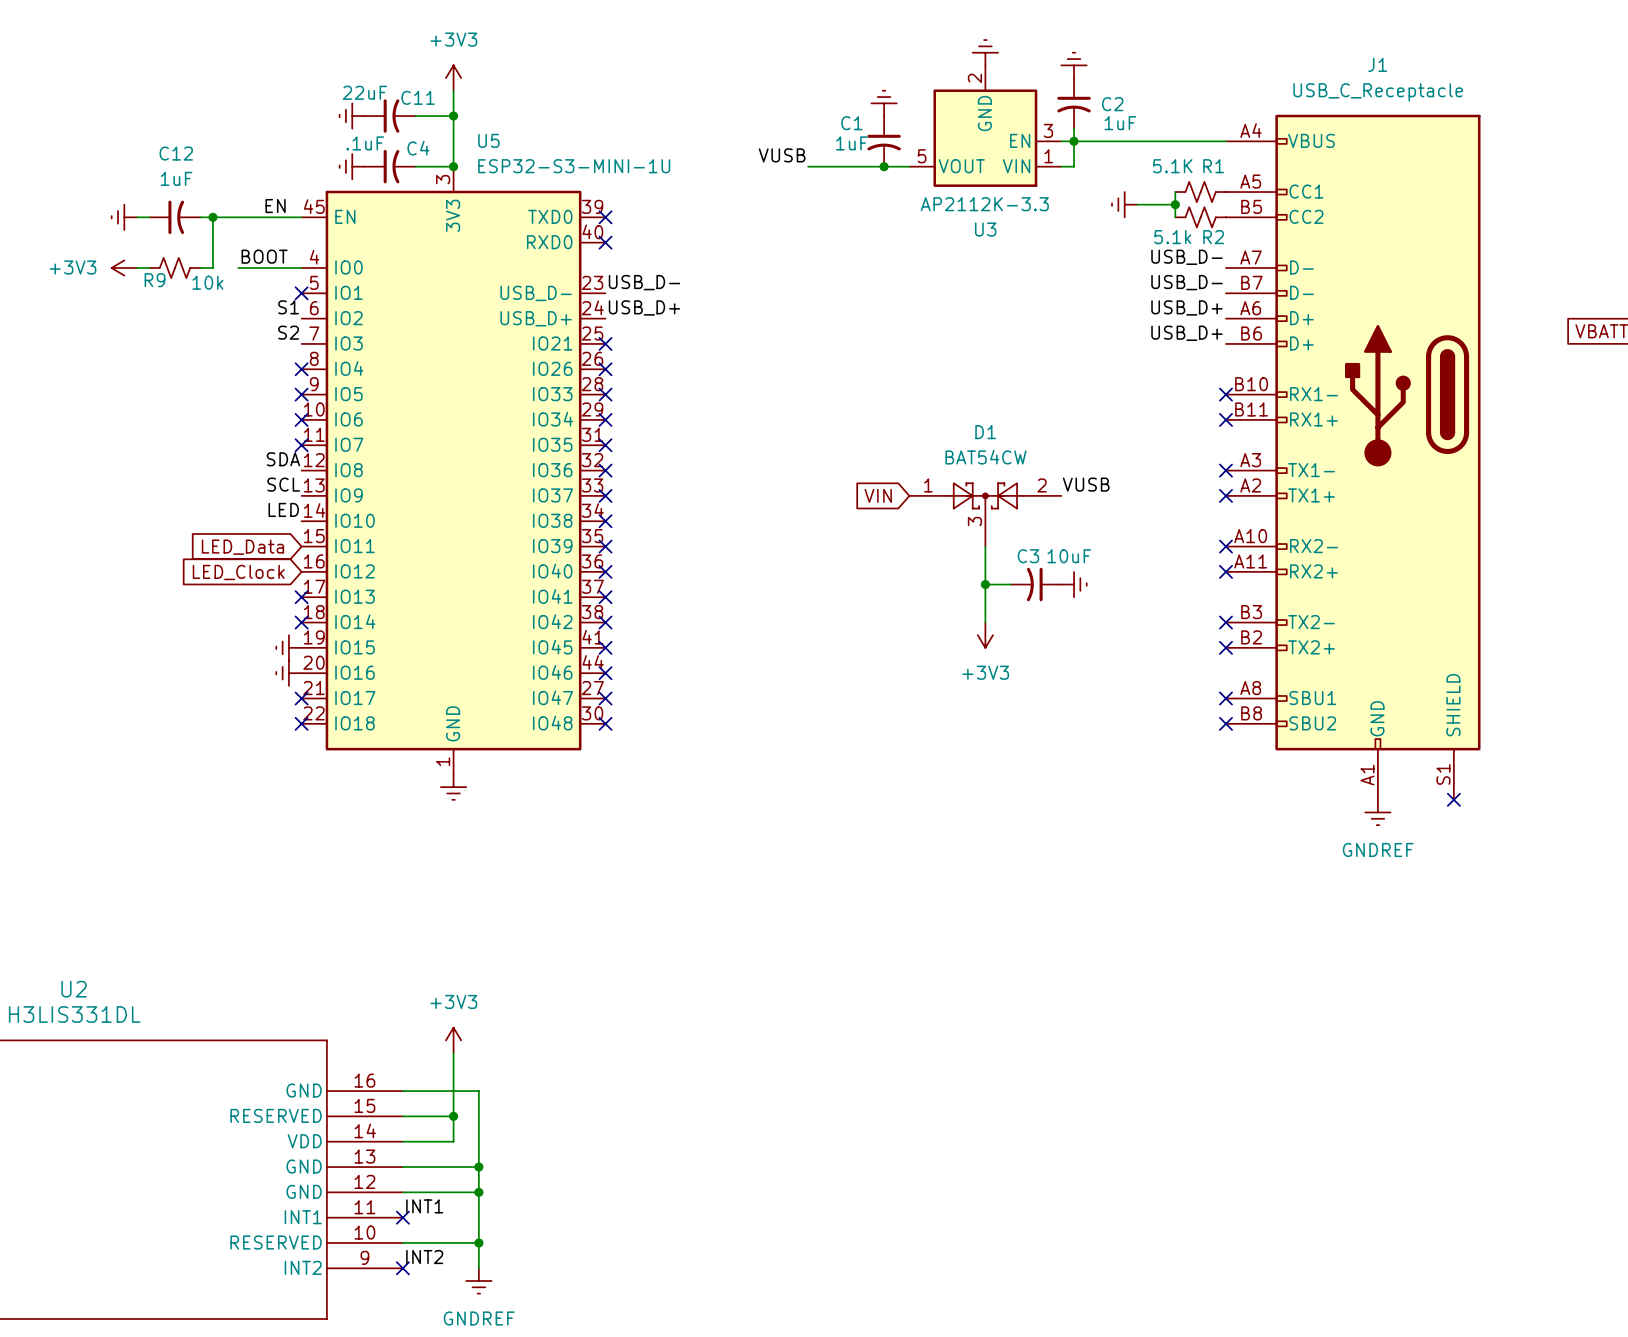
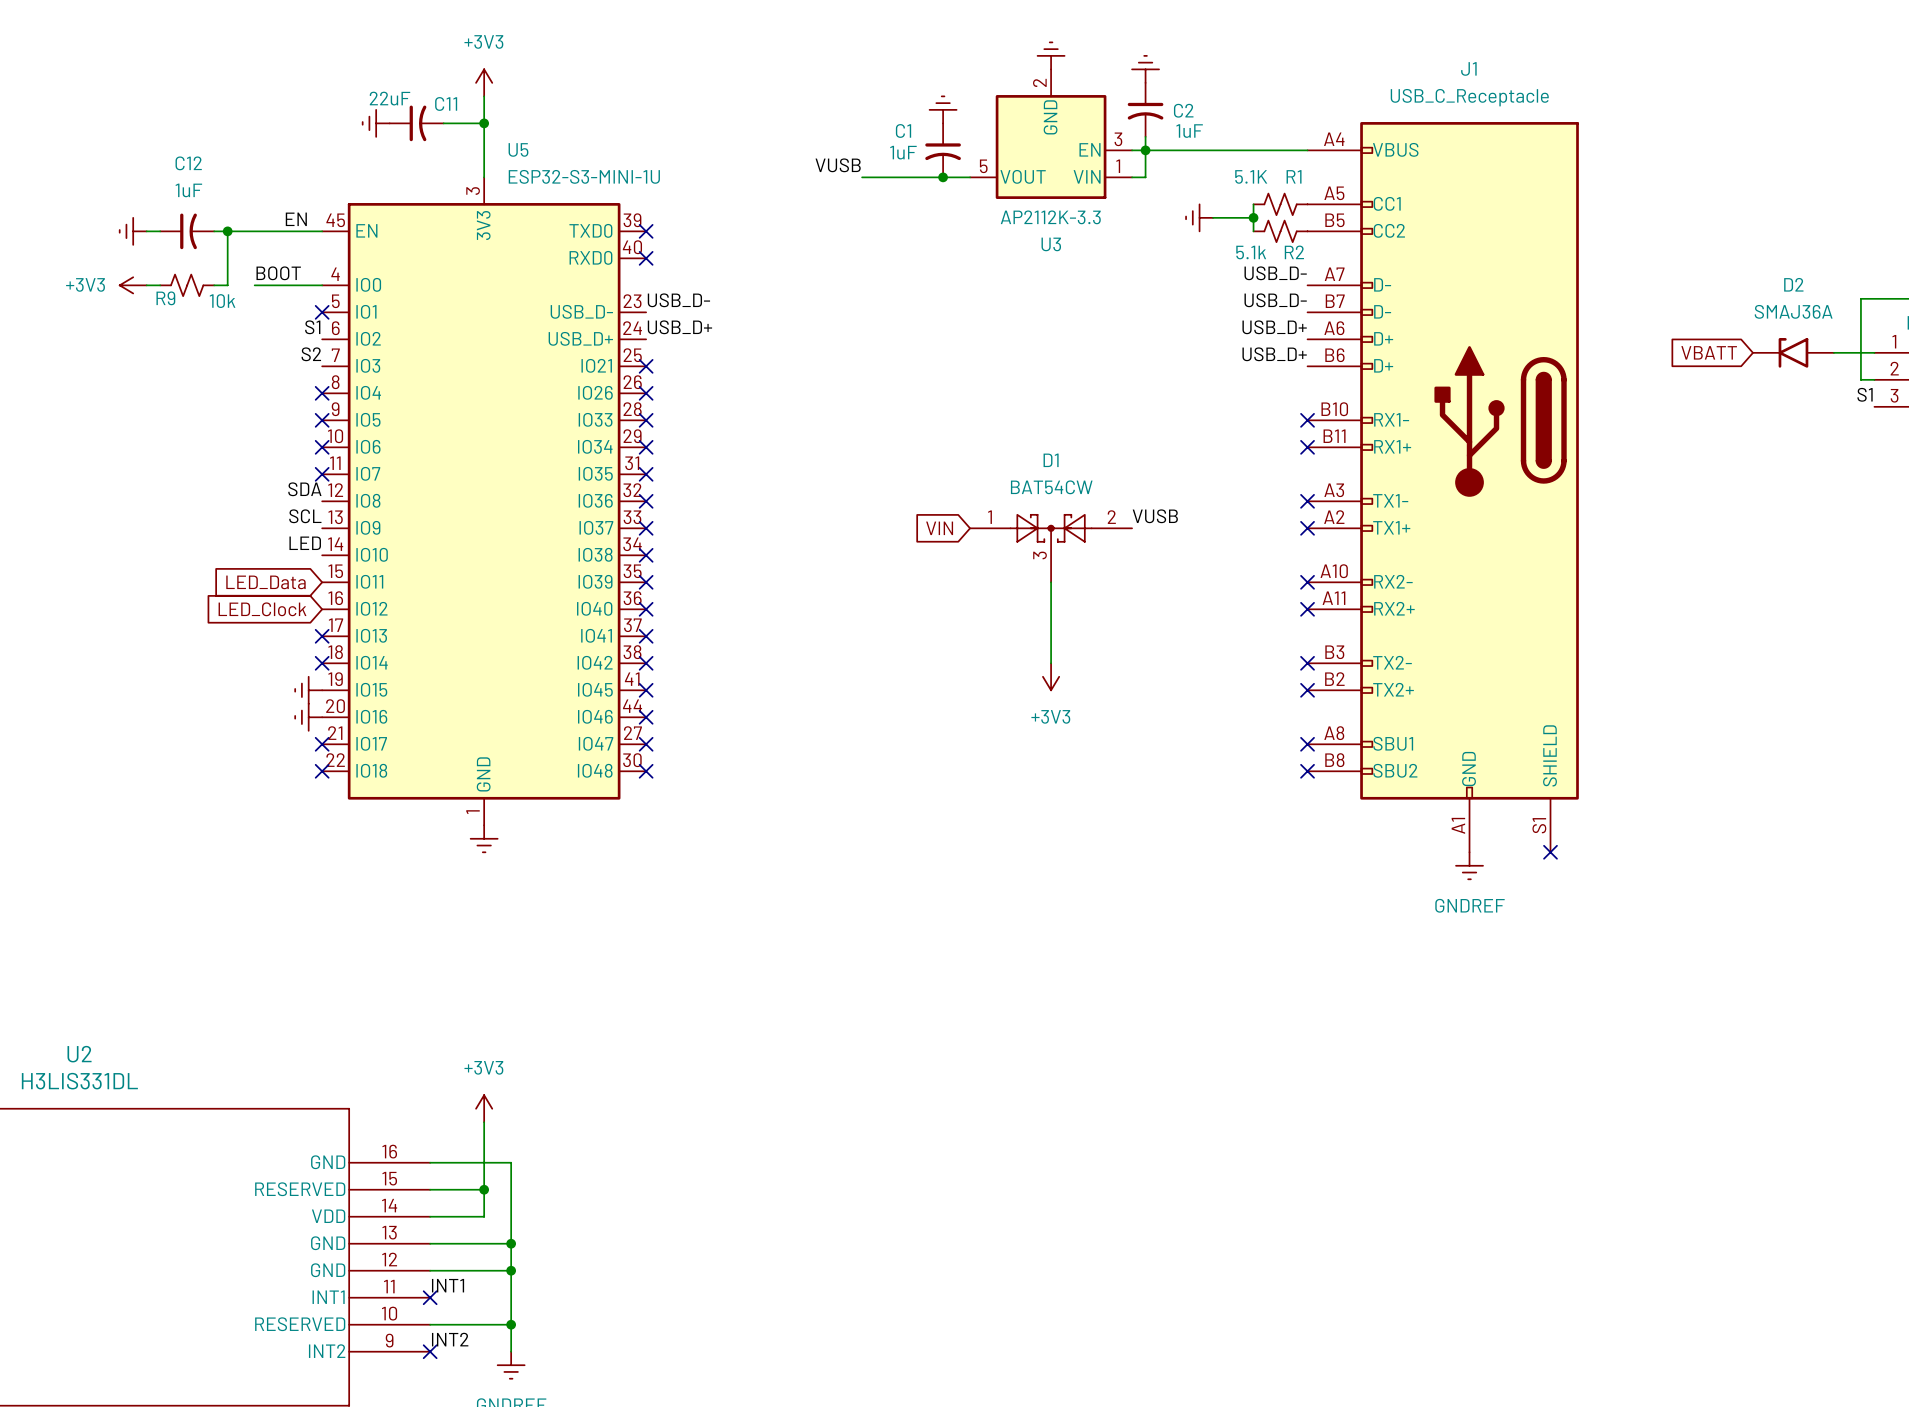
power symbol: (352, 166) -> none
C4: .1uF (390, 166) -> none
wire: (415, 166) (453, 166) -> none
junction: (453, 166) -> none
wire: (985, 584) (1010, 584) -> none
junction: (985, 584) -> none
C3: 10uF (1036, 584) -> none
power symbol: (1074, 584) -> none

